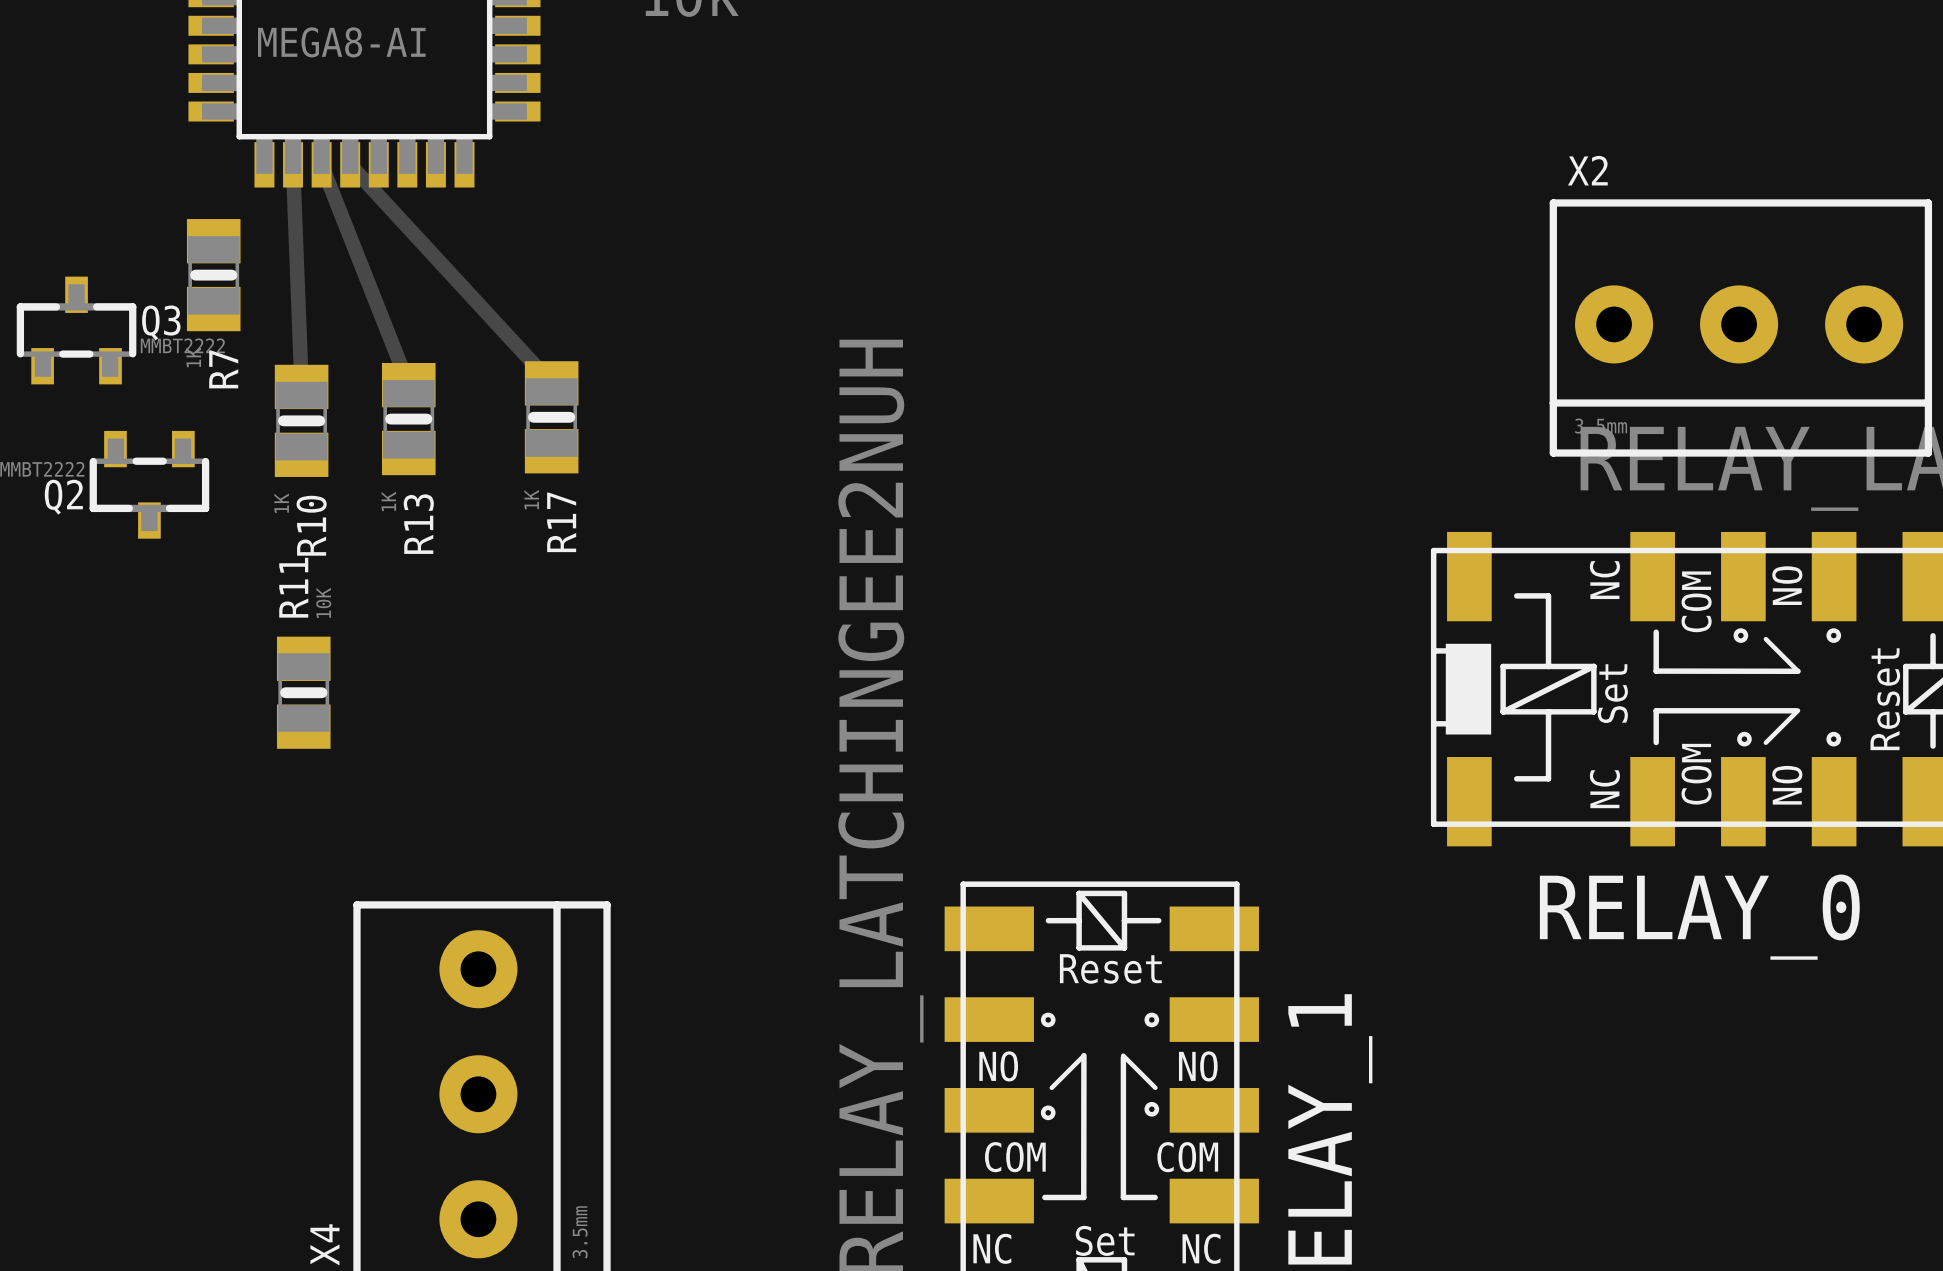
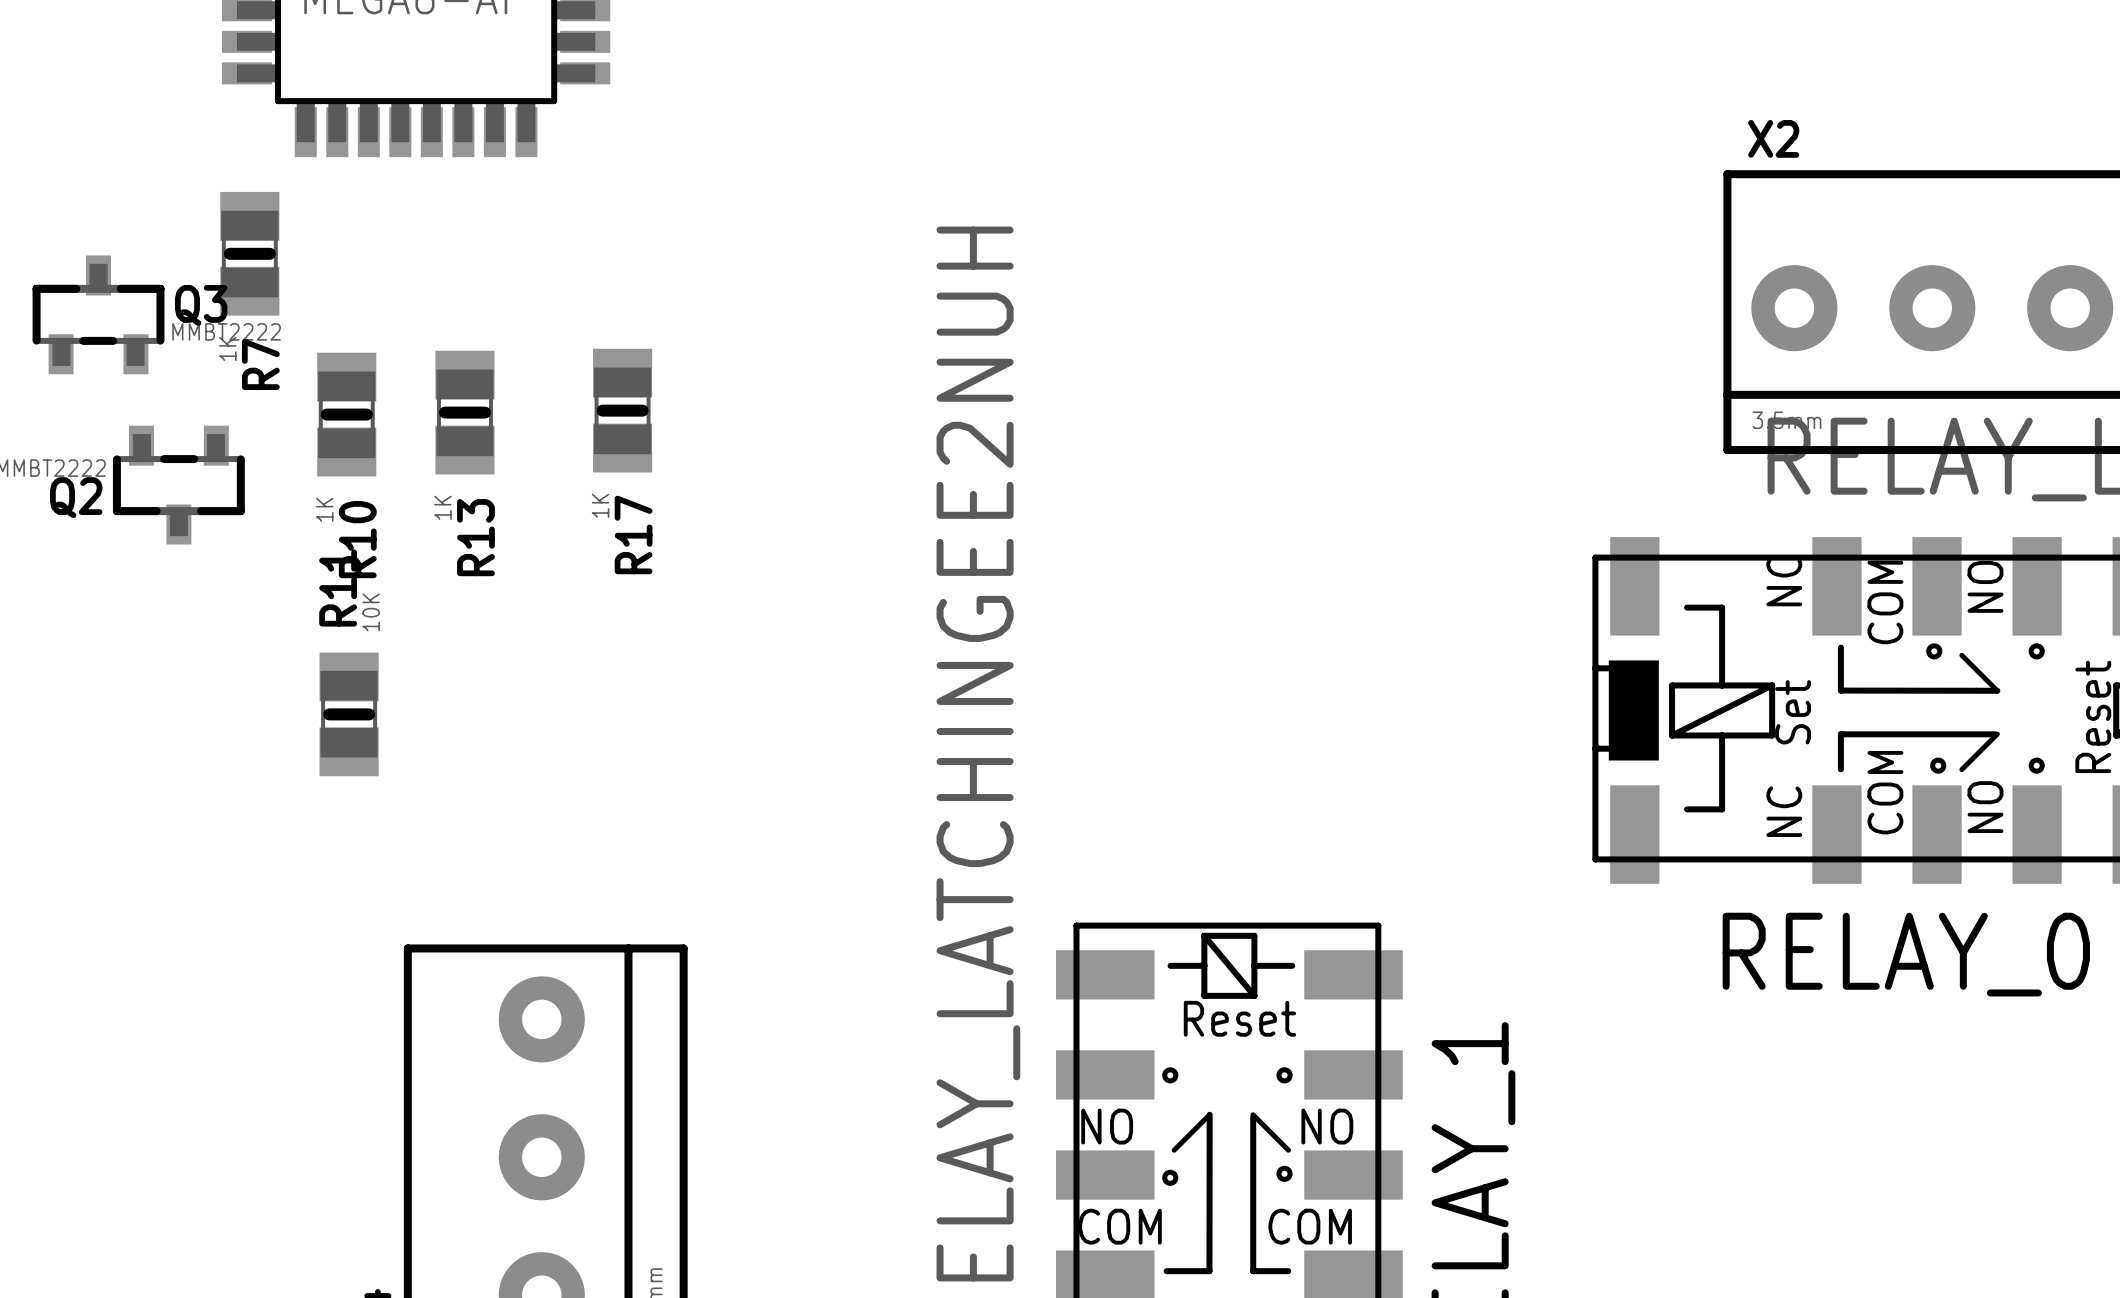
track: (293, 164) (301, 386) -> none
track: (321, 164) (408, 385) -> none
track: (350, 164) (551, 383) -> none

